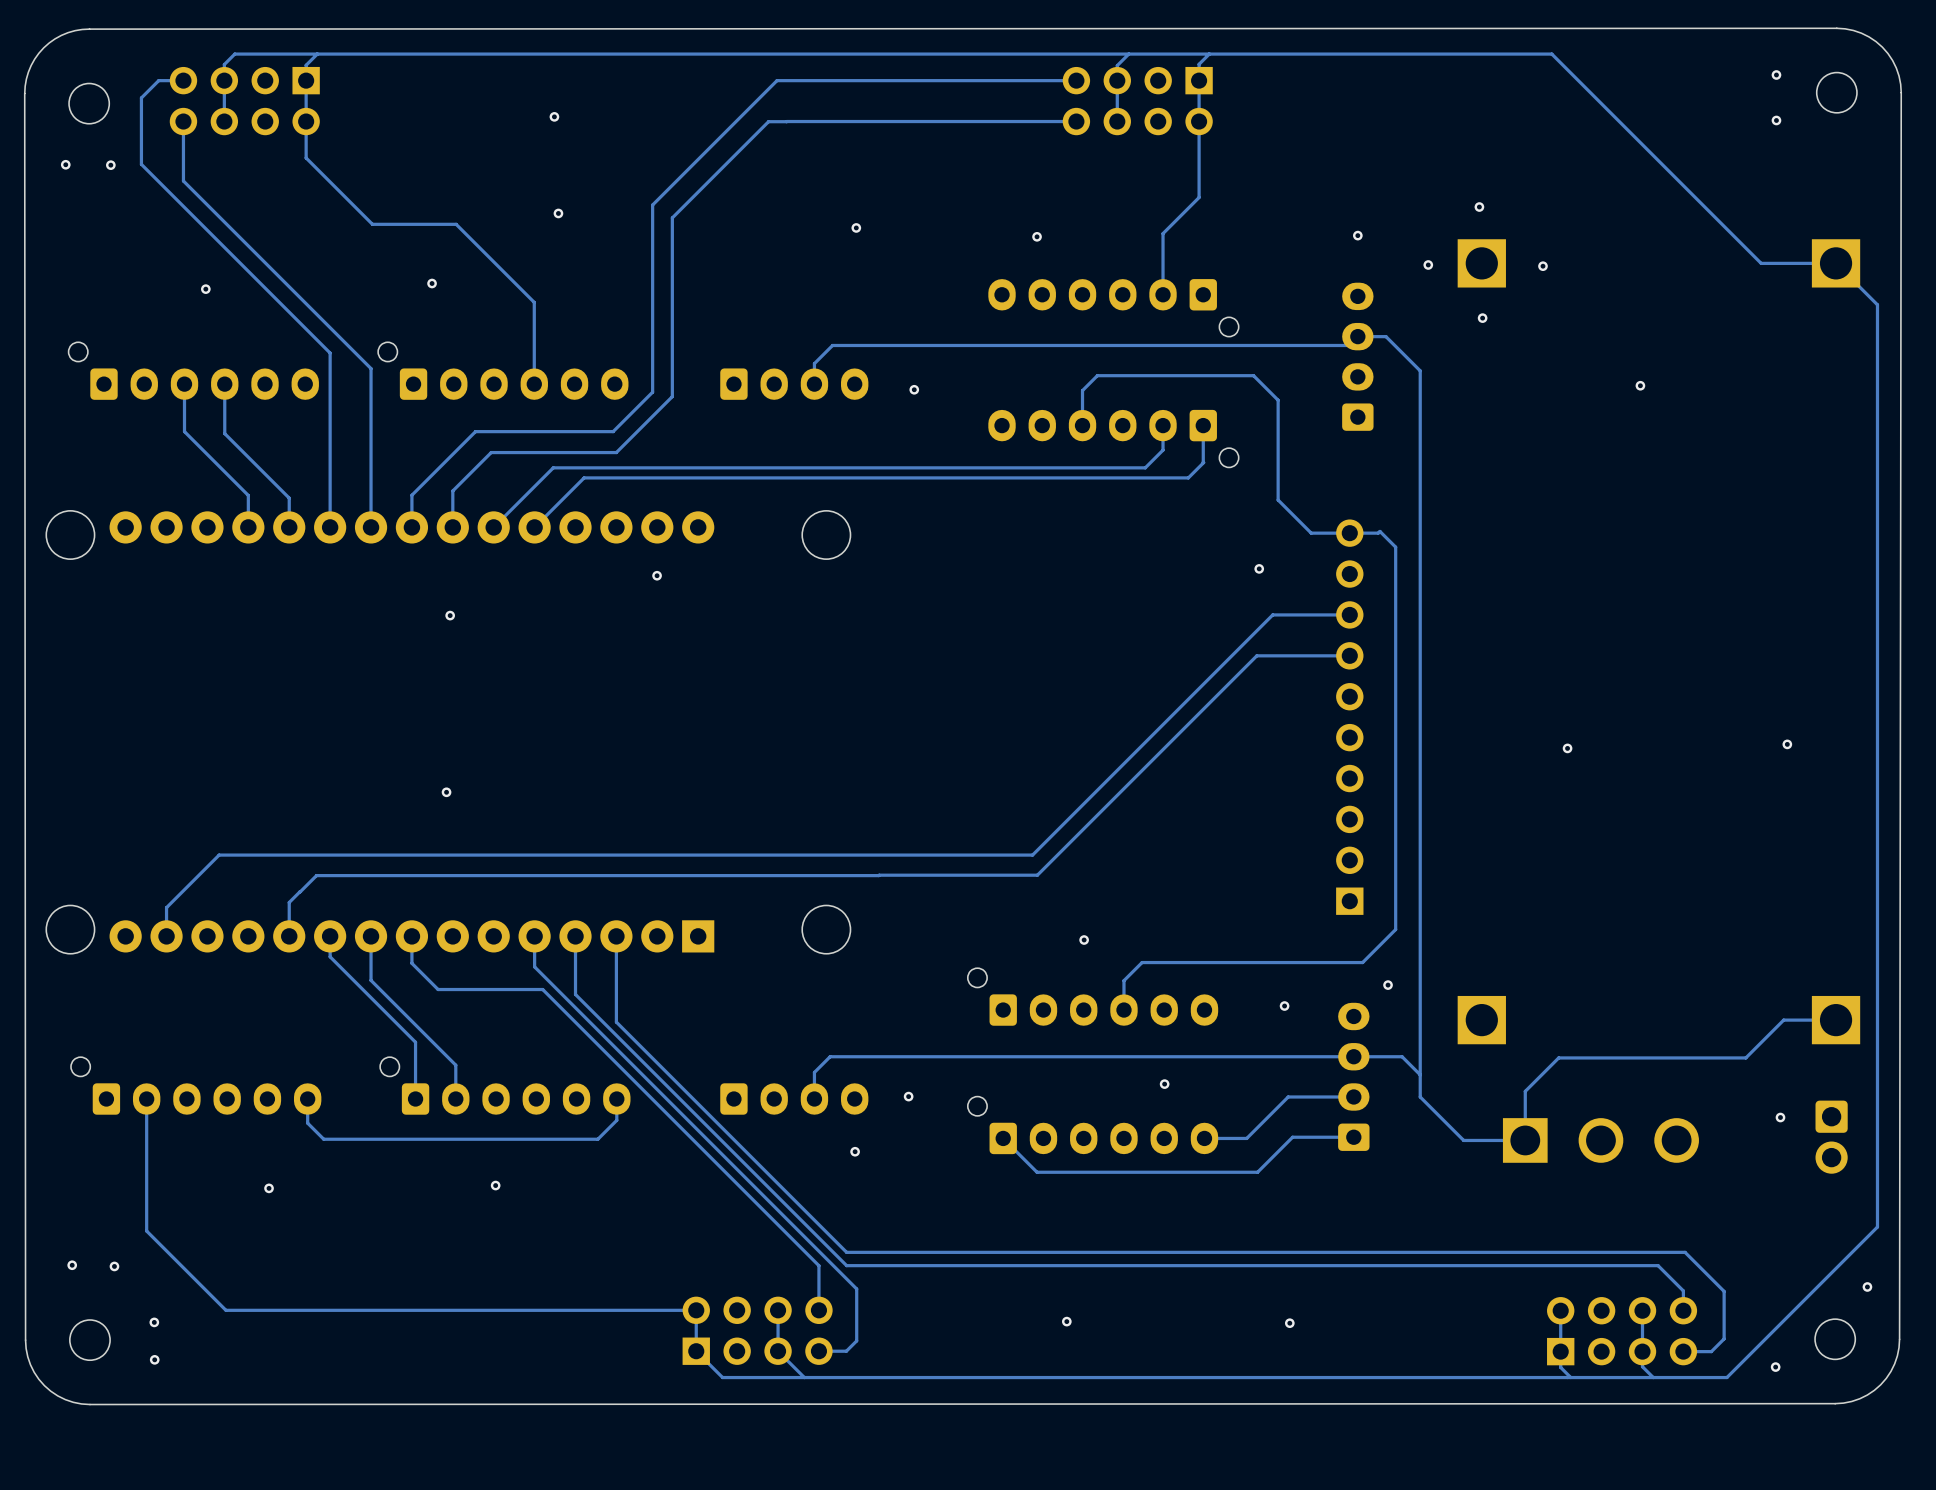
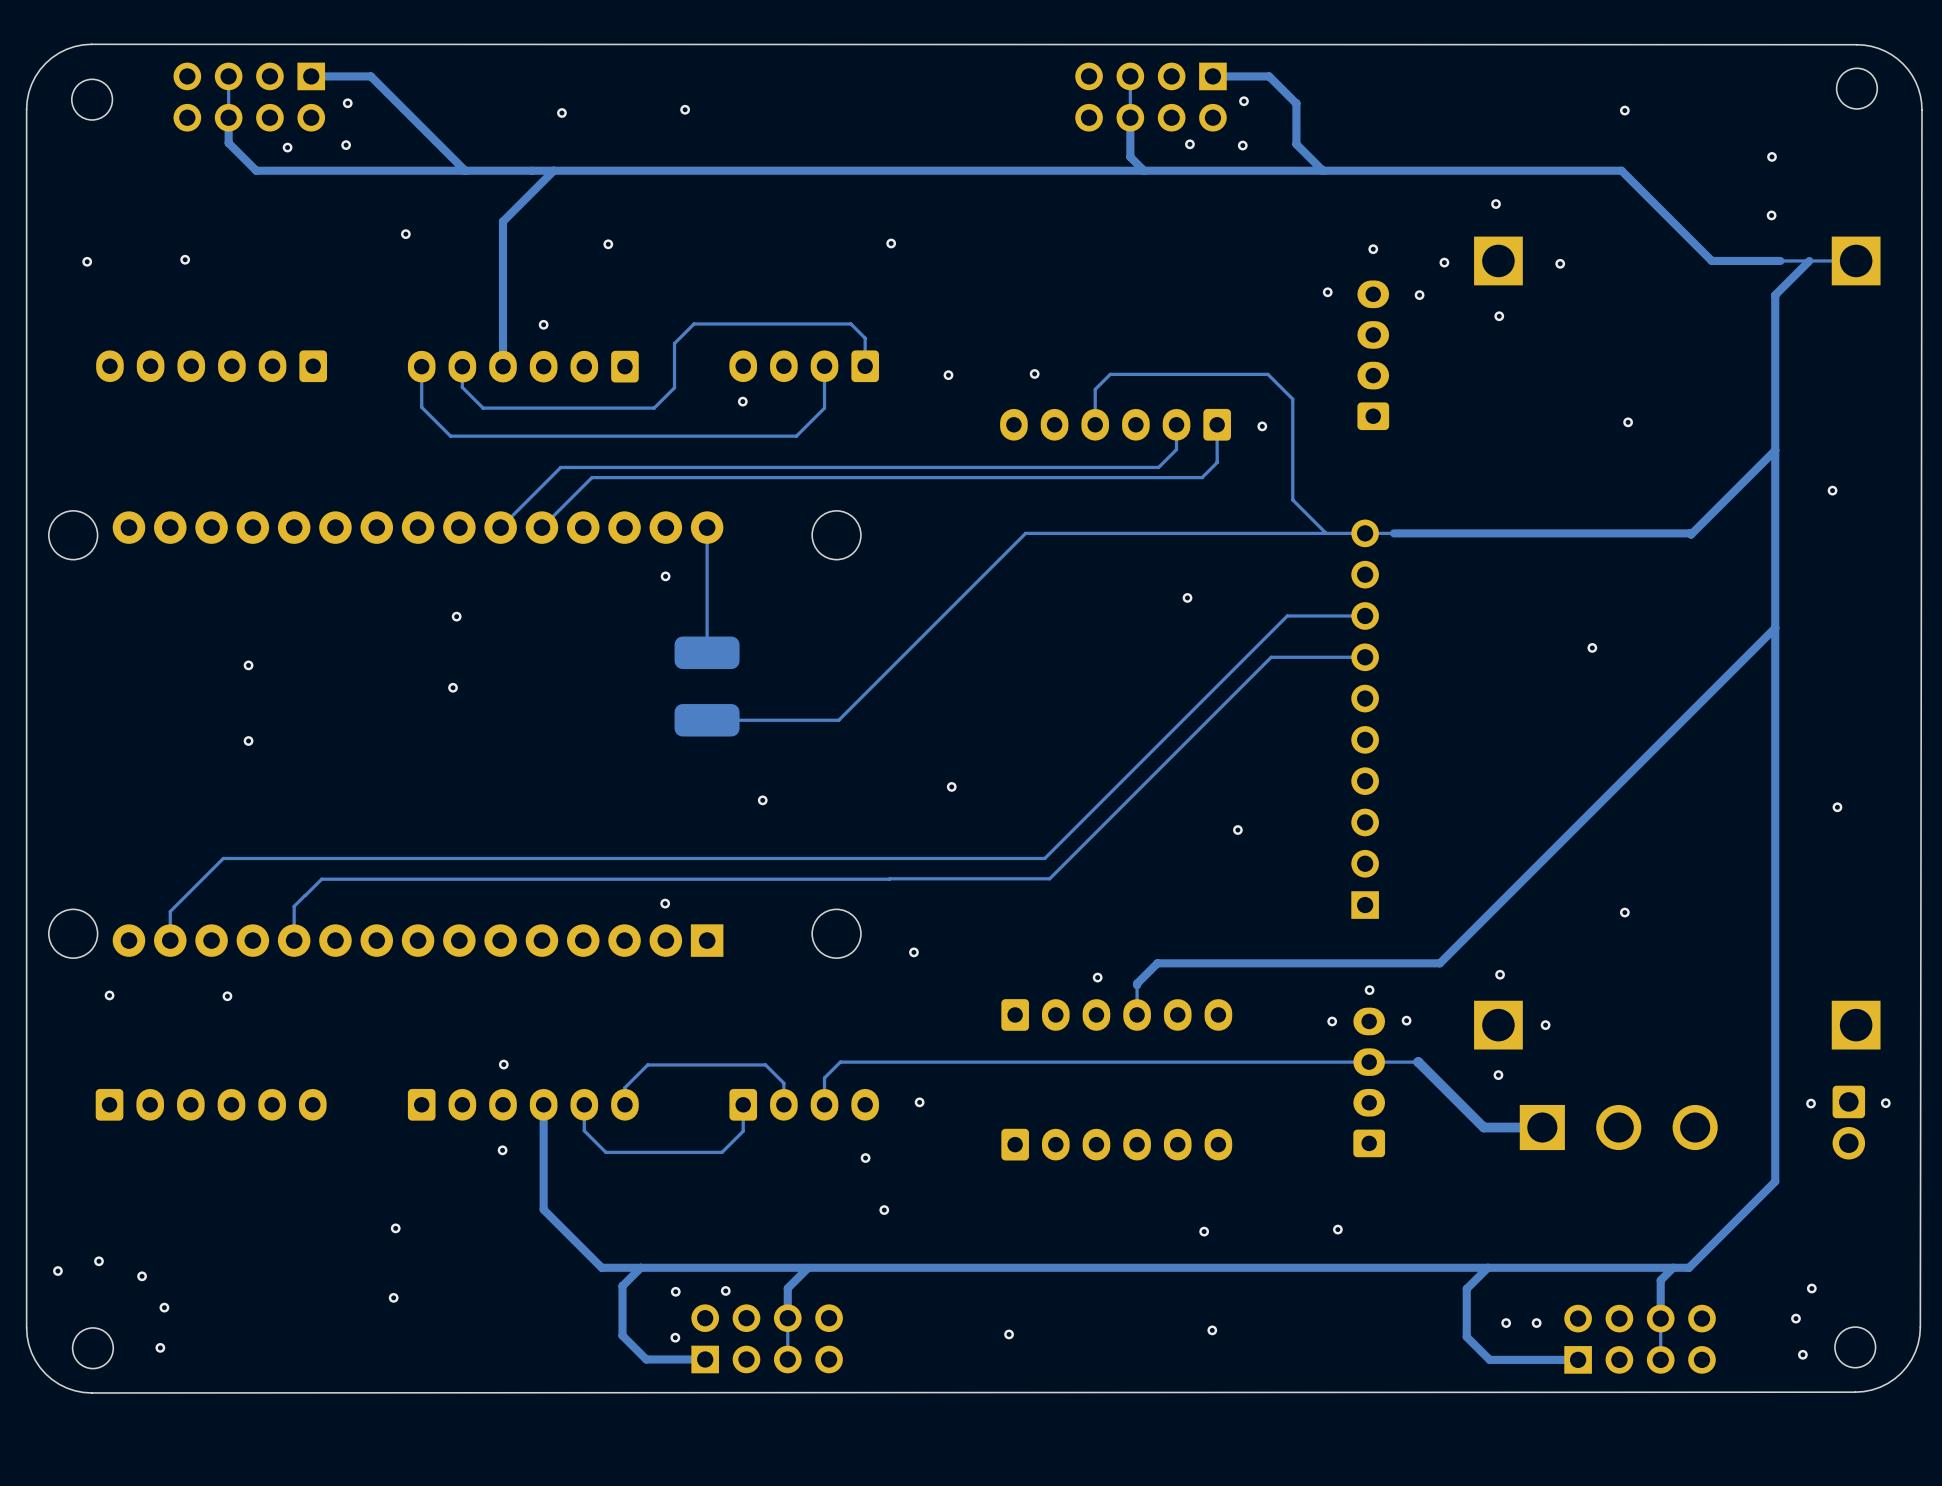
track: (317, 54) (306, 65) (306, 158) (372, 224) (456, 224) (534, 302) (534, 384) -> none
track: (1128, 54) (1117, 65) (1117, 80) -> none
track: (1209, 54) (1199, 64) (1199, 197) (1163, 233) (1163, 294) -> none
via: (1776, 75) -> none
track: (183, 80) (158, 80) (141, 97) (141, 164) (330, 353) (330, 527) -> none
track: (224, 80) (224, 64) (234, 54) (1551, 54) (1761, 263) -> (228, 117) (228, 143) (256, 170) (1621, 170) (1711, 260) (1780, 260)
track: none -> (311, 76) (370, 76) (465, 170)
track: (1076, 80) (777, 80) (652, 205) (652, 392) (613, 431) (475, 431) (411, 495) (411, 527) -> none
track: none -> (1212, 76) (1269, 76) (1296, 103) (1296, 144) (1322, 170)
via: none -> (1243, 101)
via: none -> (347, 103)
via: none -> (685, 109)
via: none -> (1624, 110)
board edge: (1901, 114) (1899, 76) (1887, 53) (1876, 41) (1861, 33) (1836, 28) (89, 29) (68, 32) (49, 43) (38, 53) (31, 65) (26, 79) (24, 93) (25, 1340) (30, 1364) (44, 1385) (65, 1399) (89, 1404) -> (1921, 110) (1920, 95) (1915, 81) (1903, 63) (1885, 51) (1871, 46) (1856, 44) (91, 44) (66, 49) (45, 63) (31, 84) (26, 109) (26, 1327) (28, 1344) (35, 1360) (45, 1373) (59, 1384) (74, 1390) (91, 1392) (1855, 1392) (1880, 1387) (1901, 1373) (1915, 1352) (1920, 1327)
via: (1776, 120) -> none
track: (183, 121) (183, 181) (371, 368) (371, 527) -> none
track: (786, 121) (768, 121) (672, 217) (672, 396) (616, 452) (491, 452) (452, 490) (452, 527) -> none
track: (1076, 121) (786, 121) -> none
track: none -> (1130, 117) (1130, 157) (1144, 170)
via: none -> (1189, 144)
via: none -> (346, 145)
via: none -> (1242, 145)
via: none -> (287, 147)
via: none -> (1771, 156)
via: (65, 164) -> none
via: (110, 165) -> none
track: none -> (553, 170) (503, 221) (503, 366)
via position: (558, 213) -> (608, 244)
via: none -> (1771, 215)
via position: (856, 227) -> (891, 243)
via position: (1357, 235) -> (1373, 249)
via: none -> (405, 234)
via: (1037, 236) -> none
track: none -> (1809, 260) (1775, 295) (1775, 1181) (1689, 1267) (810, 1267)
track: (1836, 263) (1877, 304) (1877, 1227) (1726, 1377) (722, 1377) (696, 1351) (696, 1310) (225, 1310) (146, 1231) (146, 1099) -> none
via: none -> (87, 261)
via: (432, 283) -> none
via position: (205, 289) -> (185, 259)
via: none -> (1327, 292)
via: none -> (1419, 295)
part: (1113, 307) -> none
via: none -> (543, 324)
track: (1357, 336) (1386, 336) (1420, 370) (1420, 1096) (1463, 1140) (1525, 1140) (1525, 1091) (1558, 1057) (1745, 1057) (1783, 1020) (1836, 1020) -> none
part footprint: [68, 342, 319, 400] -> [96, 350, 328, 383]
part footprint: [378, 342, 629, 400] -> [407, 350, 639, 383]
track: (1348, 345) (832, 345) (814, 363) (814, 367) -> none
track: none -> (865, 366) (865, 338) (850, 323) (694, 323) (674, 343) (674, 387) (654, 408) (483, 408) (462, 387) (462, 366)
track: none -> (421, 366) (421, 407) (450, 436) (796, 436) (824, 408) (824, 382)
via: none -> (1034, 373)
track: (184, 384) (184, 431) (248, 495) (248, 527) -> none
track: (224, 384) (224, 433) (289, 498) (289, 527) -> none
part rotation: 0° (794, 384) -> 180° (804, 366)
via position: (1640, 385) -> (1628, 422)
via position: (914, 389) -> (948, 375)
via: none -> (742, 401)
via: none -> (1262, 426)
part: (1113, 438) -> none
track: none -> (1775, 450) (1691, 534) (1393, 533)
via: none -> (1832, 490)
track: none -> (706, 528) (707, 652)
track: none -> (1326, 533) (1025, 533) (838, 720) (707, 720)
track: (1378, 533) (1379, 531) (1395, 547) (1395, 929) (1362, 962) (1142, 962) (1123, 980) -> (1775, 628) (1439, 963) (1157, 963) (1137, 985)
via: (1259, 568) -> none
via: none -> (1187, 597)
via: none -> (1592, 647)
part: none -> (707, 652)
via: none -> (248, 665)
via: none -> (453, 687)
part: none -> (707, 720)
via: none -> (248, 741)
via position: (1787, 744) -> (1837, 807)
via: (1567, 748) -> none
via: none -> (951, 786)
via: (446, 792) -> none
via: none -> (762, 800)
via: none -> (1237, 830)
via: none -> (665, 903)
via: none -> (1624, 912)
track: (330, 936) (330, 956) (415, 1042) (415, 1099) -> none
track: (371, 936) (371, 980) (455, 1065) (455, 1099) -> none
track: (411, 936) (411, 963) (438, 989) (542, 989) (818, 1265) (818, 1310) -> none
track: (534, 936) (534, 966) (856, 1288) (856, 1340) (846, 1351) (818, 1351) -> none
track: (575, 936) (575, 994) (846, 1265) (1658, 1265) (1683, 1290) (1683, 1310) -> none
track: (616, 936) (616, 1022) (846, 1252) (1685, 1252) (1724, 1291) (1724, 1338) (1711, 1351) (1683, 1351) -> none
via position: (1084, 940) -> (1097, 977)
via: none -> (913, 952)
via: none -> (1500, 974)
via: none -> (1369, 990)
via: (1388, 985) -> none
via: none -> (109, 995)
via: none -> (227, 996)
part: (1092, 996) -> none
via position: (1284, 1006) -> (1332, 1021)
via: none -> (1406, 1020)
via: none -> (1545, 1025)
track: (1402, 1056) (1420, 1074) -> (1417, 1062) (1483, 1127) (1542, 1127)
via: none -> (503, 1064)
via: none -> (1498, 1075)
via: (1164, 1084) -> none
part: (196, 1085) -> none
part: (505, 1085) -> none
track: (1353, 1096) (1288, 1096) (1246, 1138) (1204, 1138) -> none
via: none -> (1885, 1103)
part: none -> (211, 1104)
part: none -> (523, 1104)
track: none -> (543, 1104) (543, 1209) (601, 1267) (808, 1267) (787, 1288) (787, 1318)
track: (616, 1099) (616, 1120) (597, 1139) (323, 1139) (307, 1123) (307, 1099) -> (624, 1104) (624, 1087) (647, 1064) (765, 1064) (783, 1083) (783, 1104)
track: none -> (743, 1104) (743, 1131) (722, 1152) (605, 1152) (584, 1130) (584, 1104)
via position: (1780, 1117) -> (1811, 1103)
part: (1092, 1125) -> none
track: (1353, 1137) (1292, 1137) (1257, 1172) (1037, 1172) (1003, 1138) -> none
part position: (1831, 1137) -> (1848, 1122)
part: none -> (1116, 1144)
part position: (1600, 1140) -> (1618, 1127)
via position: (495, 1185) -> (502, 1150)
via: (269, 1188) -> none
via: none -> (884, 1210)
via: none -> (395, 1228)
via: none -> (1337, 1229)
via: none -> (1204, 1231)
via: none -> (98, 1261)
track: none -> (640, 1267) (622, 1286) (622, 1335) (646, 1359) (705, 1359)
track: none -> (1487, 1267) (1466, 1288) (1466, 1336) (1489, 1359) (1578, 1359)
track: none -> (1673, 1267) (1660, 1280) (1660, 1318)
via: none -> (57, 1271)
via: (72, 1265) -> none
via: (114, 1266) -> none
via: none -> (142, 1276)
via: none -> (1811, 1288)
via: none -> (725, 1290)
via: none -> (675, 1291)
via: (1867, 1286) -> none
via: none -> (393, 1297)
via: none -> (164, 1307)
track: (1560, 1310) (1560, 1367) (1570, 1377) -> none
via: none -> (1795, 1318)
via: none -> (1506, 1323)
via: none -> (1536, 1323)
board edge: (1899, 1319) (1897, 1355) (1886, 1378) (1867, 1395) (1851, 1401) (1835, 1403) (90, 1404) -> none
via: (1066, 1321) -> none
via: (154, 1322) -> none
via: none -> (1212, 1330)
via: (1289, 1323) -> none
via: none -> (1009, 1334)
via: none -> (675, 1337)
via: none -> (160, 1347)
track: (778, 1351) (804, 1377) -> none
track: (1642, 1351) (1642, 1366) (1653, 1377) -> none
via: (154, 1359) -> none
via position: (1775, 1367) -> (1802, 1354)

